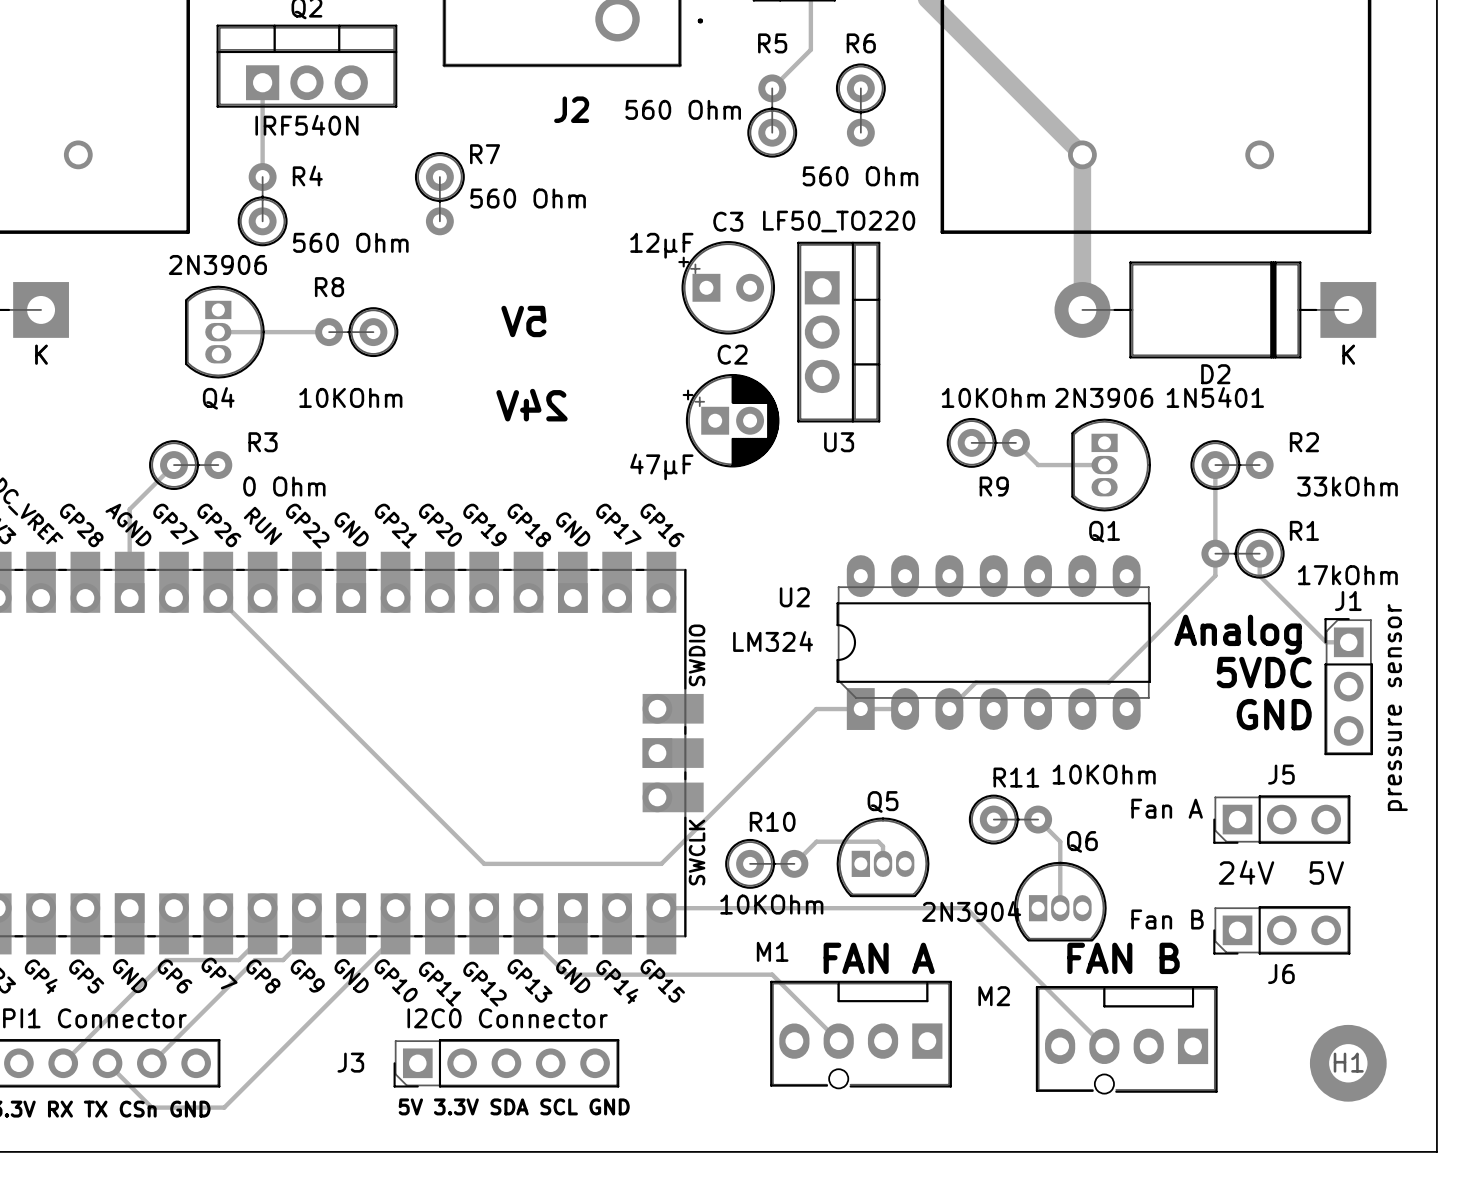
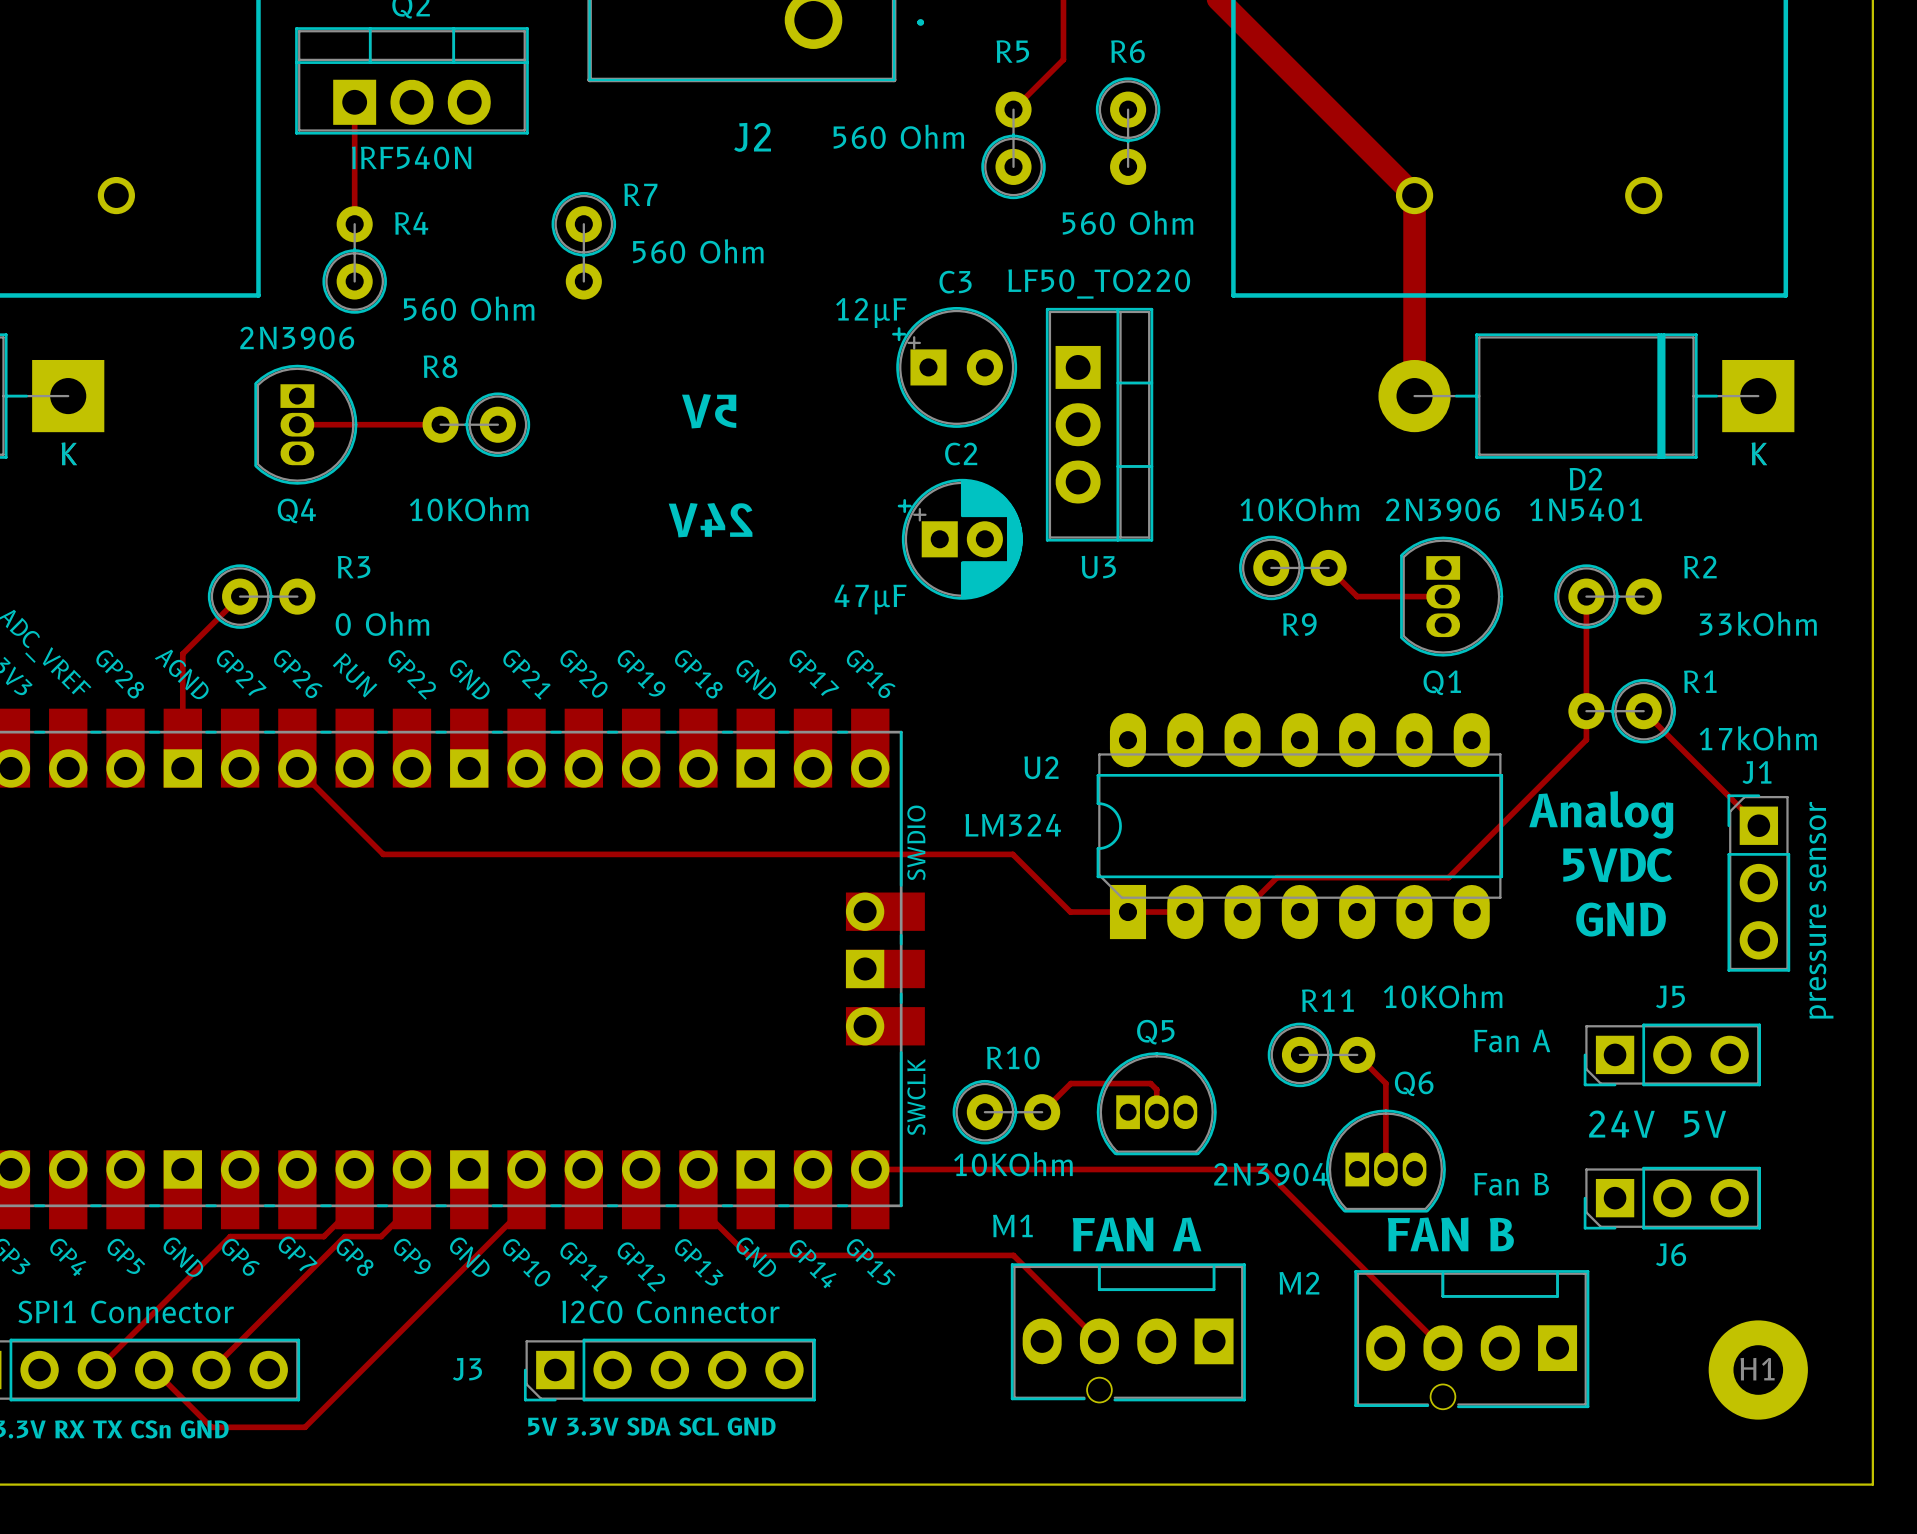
track: (1259, 553) (1259, 575) (1326, 642) (1348, 642) -> (1643, 711) (1758, 825)
track: (284, 664) (484, 863) (661, 863) (816, 709) -> (383, 854) (1012, 854) (1070, 912)

